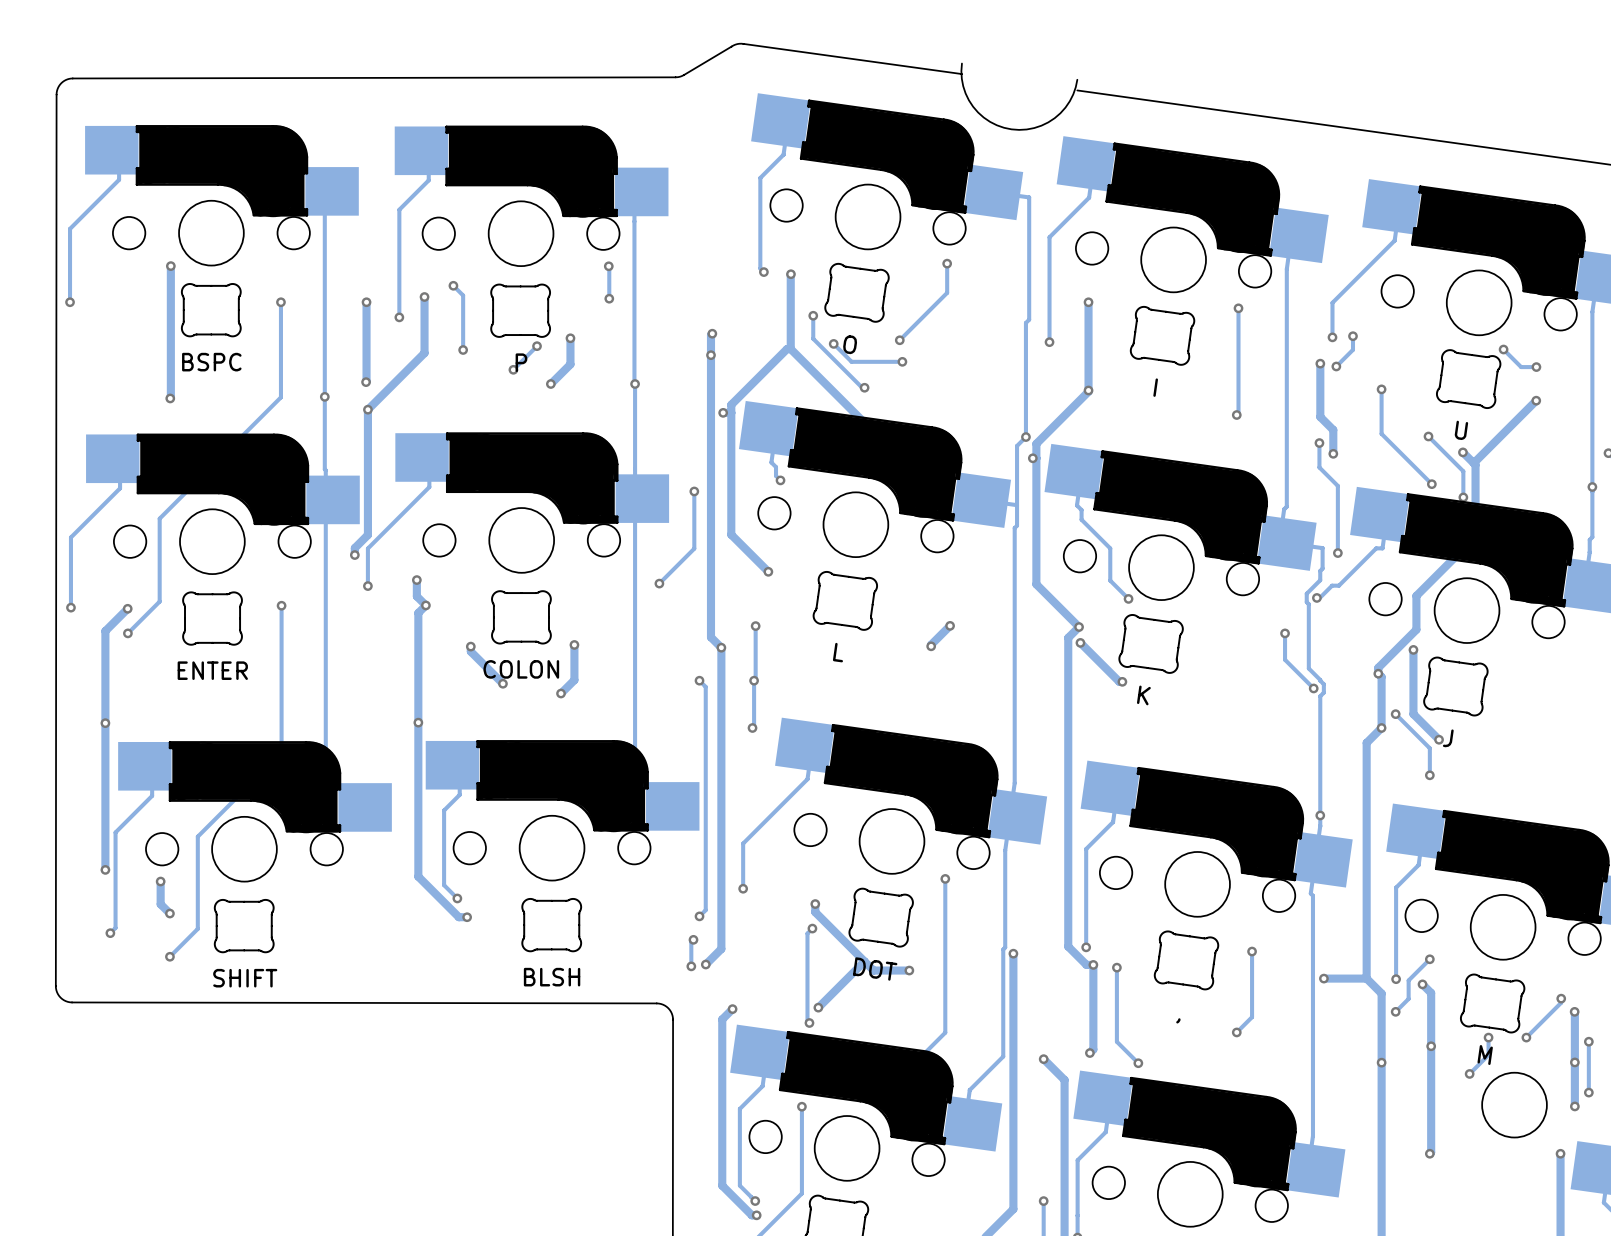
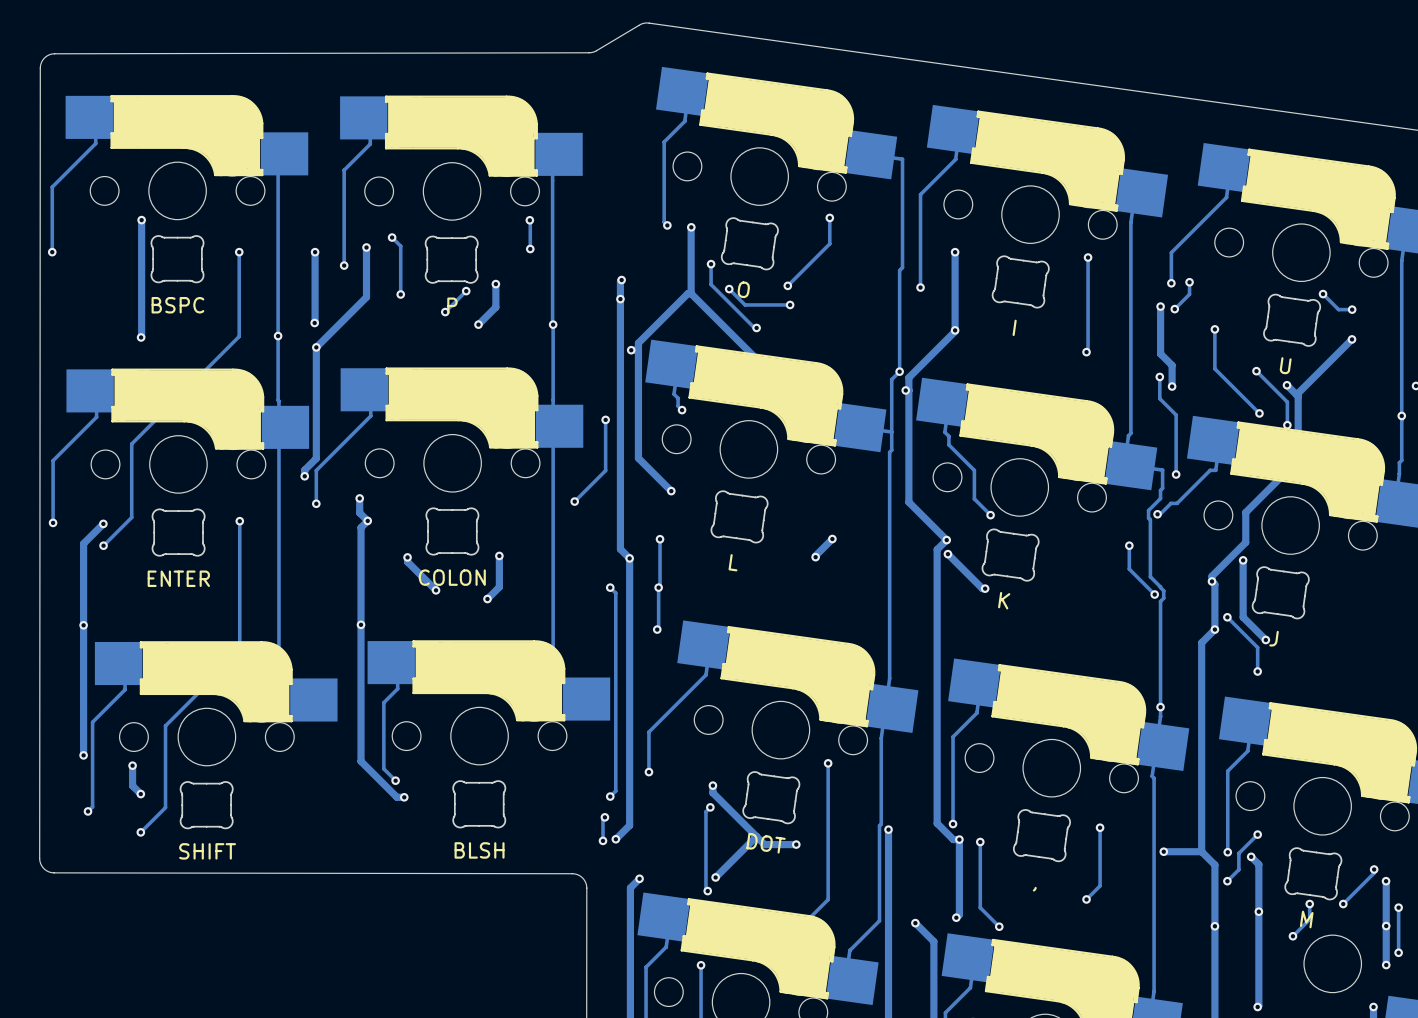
board edge: (743, 43) (961, 74) -> (649, 23) (945, 64)
board edge: (961, 63) (963, 86) (973, 106) (990, 121) (1011, 129) (1034, 128) (1054, 118) (1069, 101) (1077, 79) -> none

